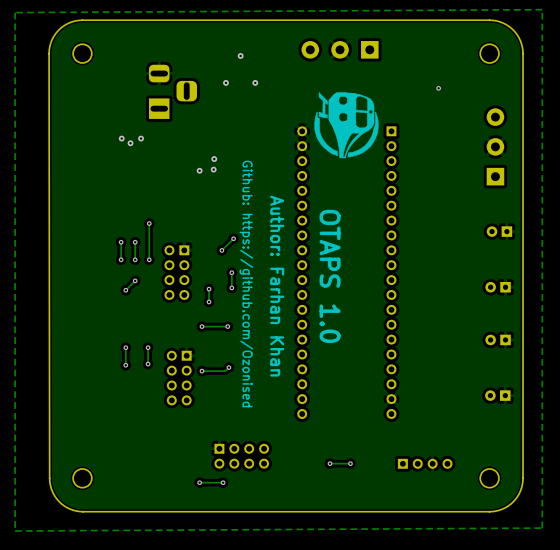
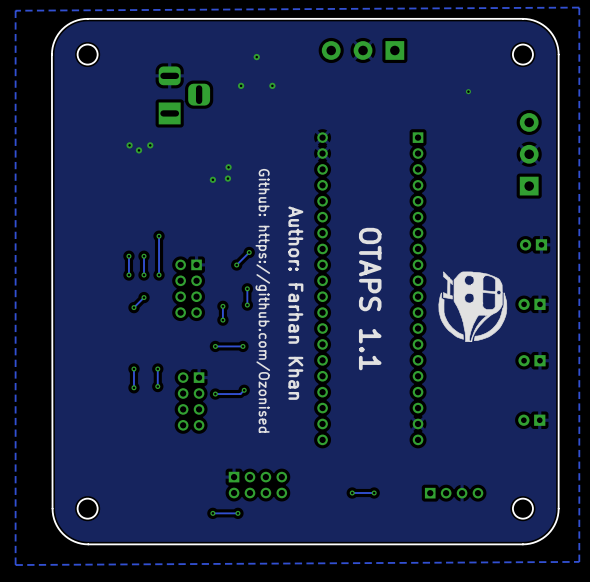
drawing: [314, 92, 379, 159] -> none
drawing: none -> [438, 271, 508, 342]
text: OTAPS 1.0 (330, 276) -> OTAPS 1.1 (370, 299)

